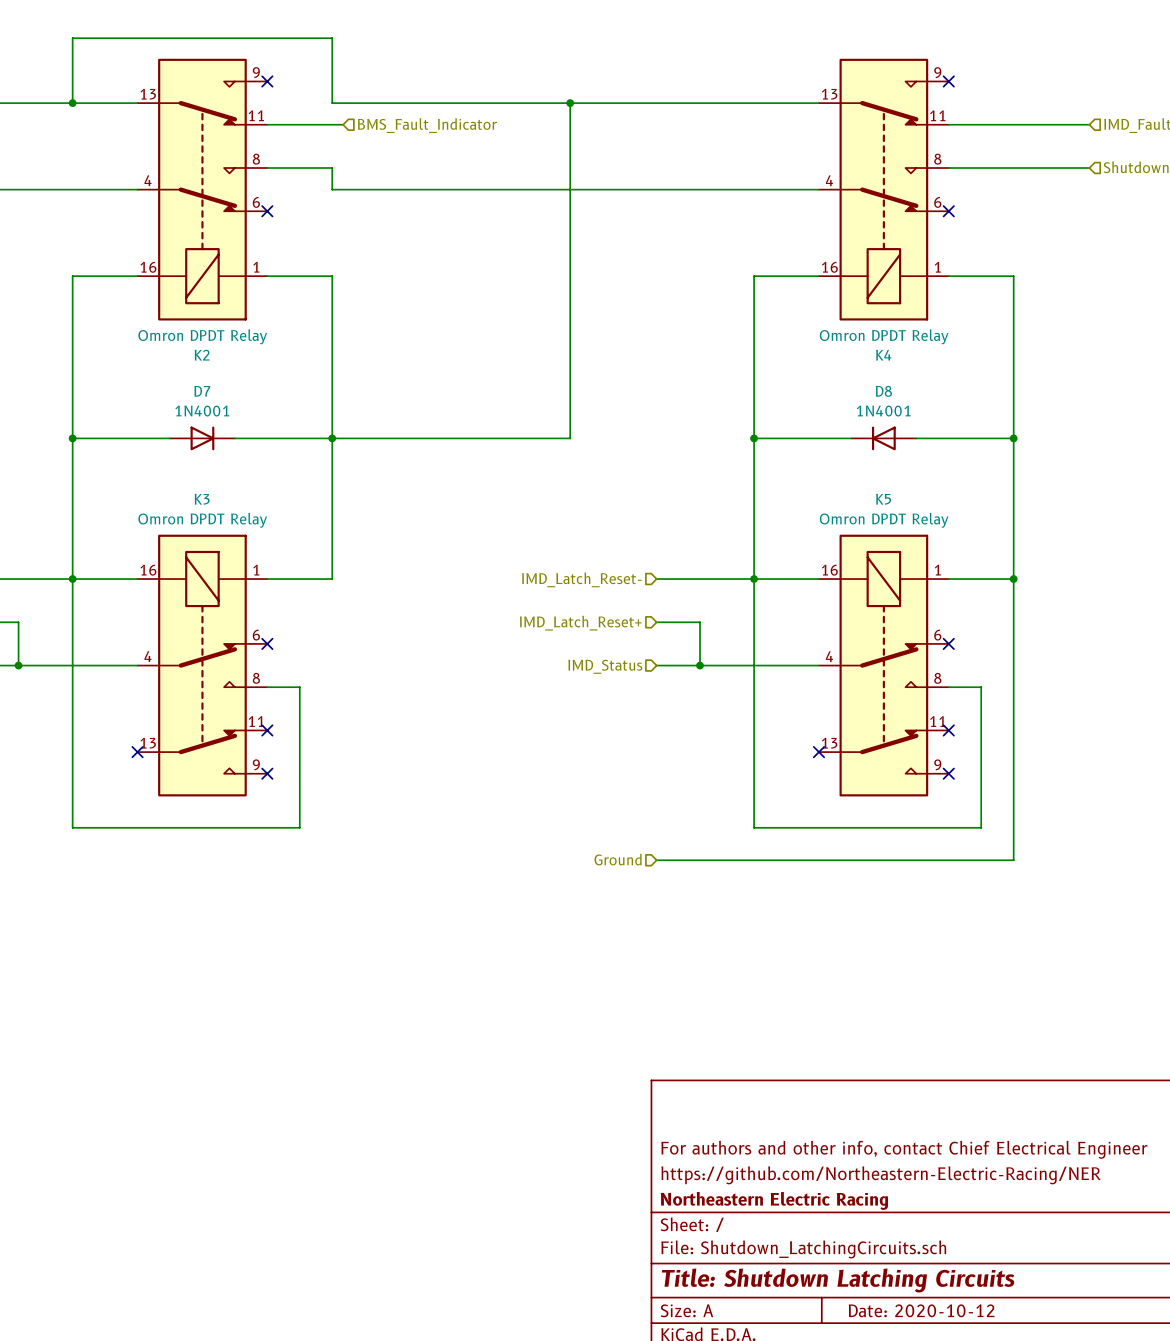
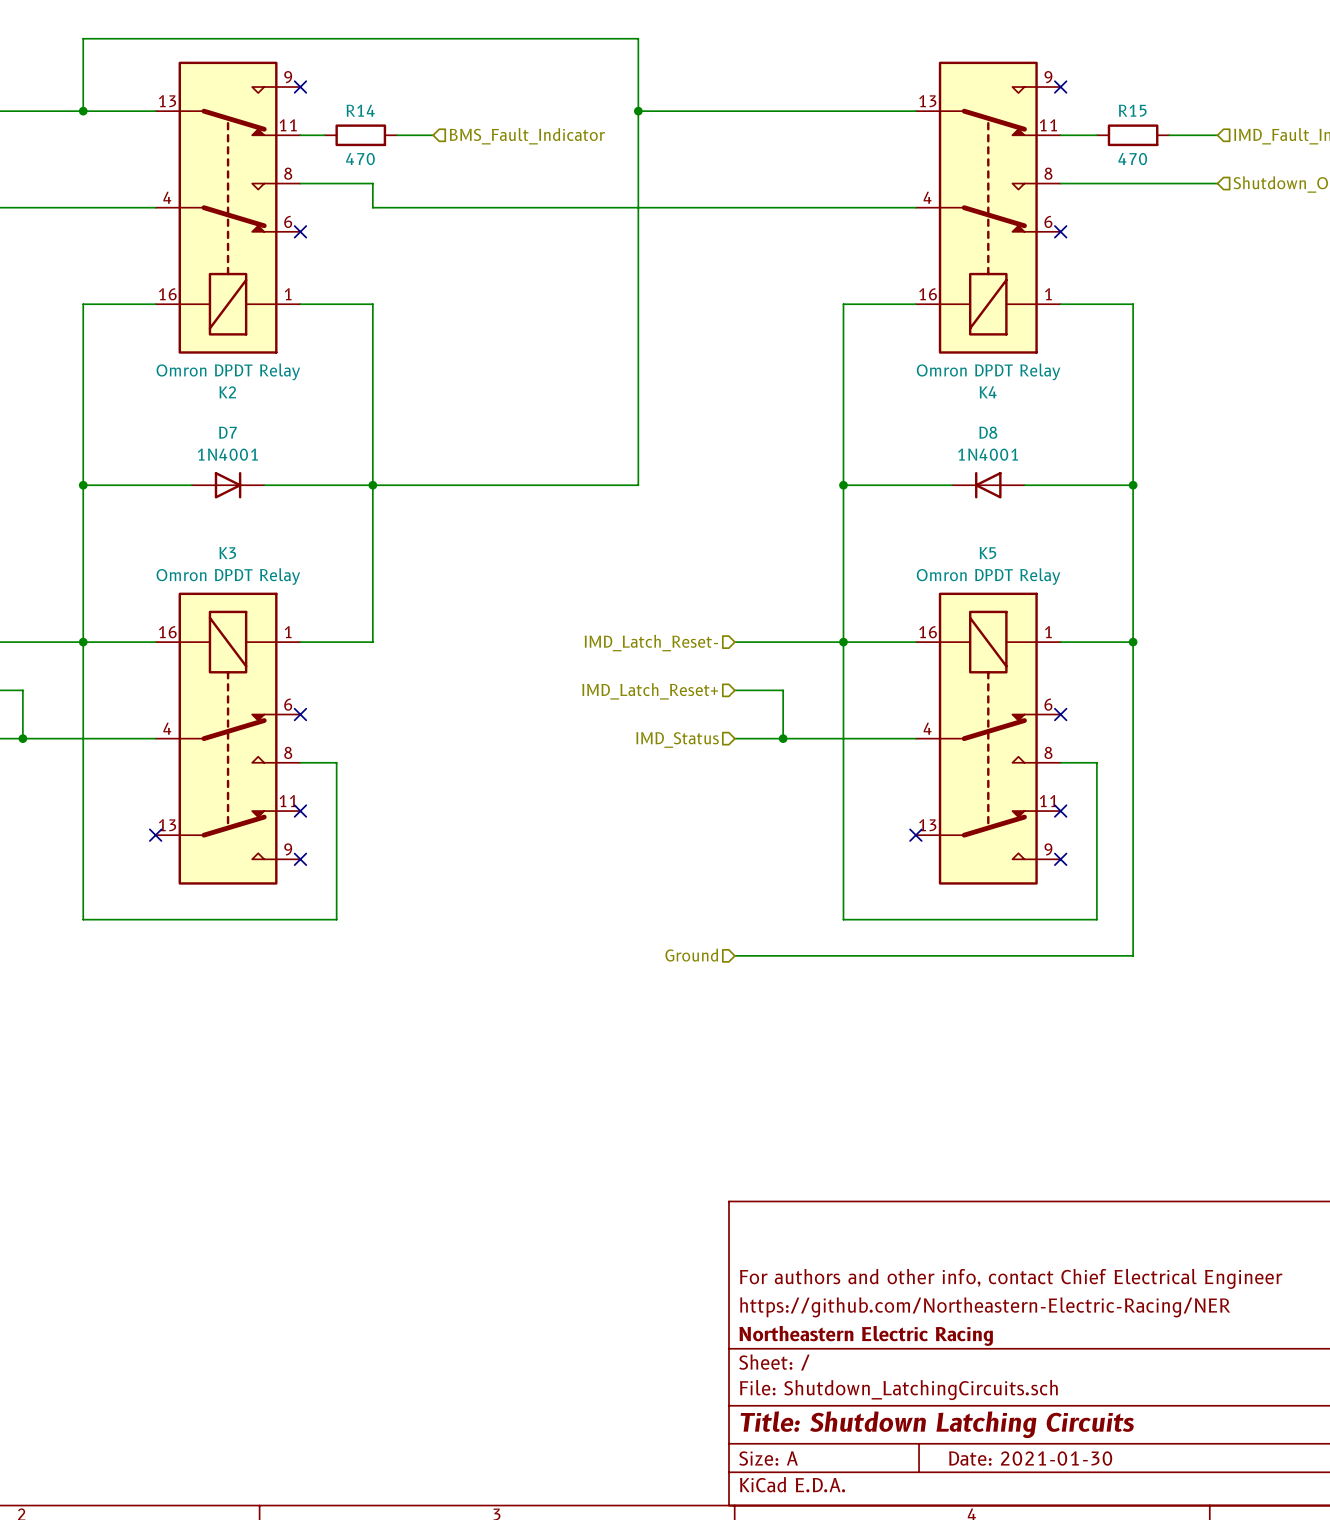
wire: (332, 38) (332, 103) (570, 103) -> (372, 38) (638, 38) (638, 111)
wire: (288, 124) (343, 124) -> none
R14: none -> 470 (360, 135)
wire: none -> (396, 135) (433, 135)
wire: (981, 124) (1046, 124) -> none
R15: none -> 470 (1133, 135)
hierarchical label position: BMS_Fault_Indicator (427, 125) -> BMS_Fault_Indicator (527, 136)
title block: Date: 2020-10-12 (921, 1310) -> Date: 2021-01-30 (1030, 1458)

